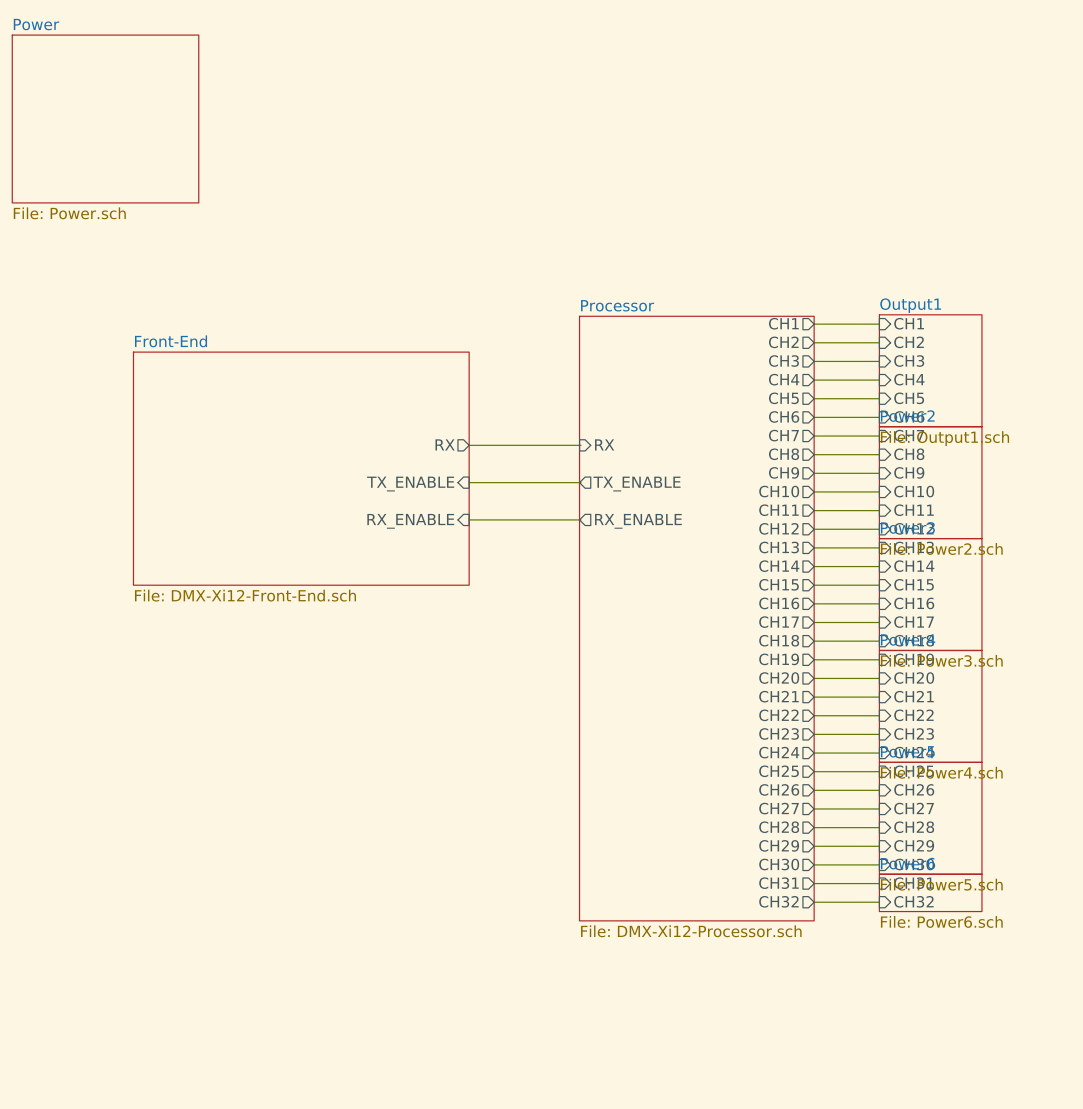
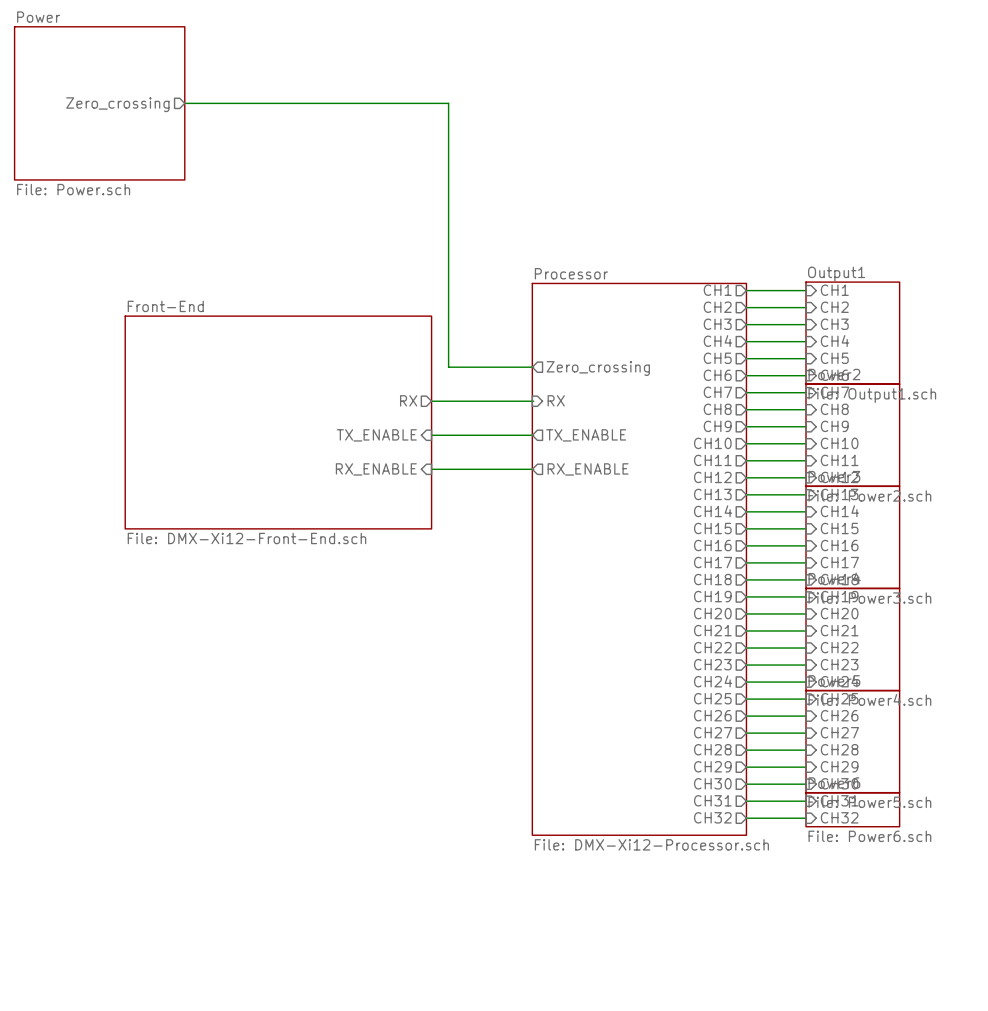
wire: none -> (184, 103) (448, 103) (448, 367) (533, 367)
sheet pin: none -> Zero_crossing (117, 104)
sheet pin: none -> Zero_crossing (598, 368)

